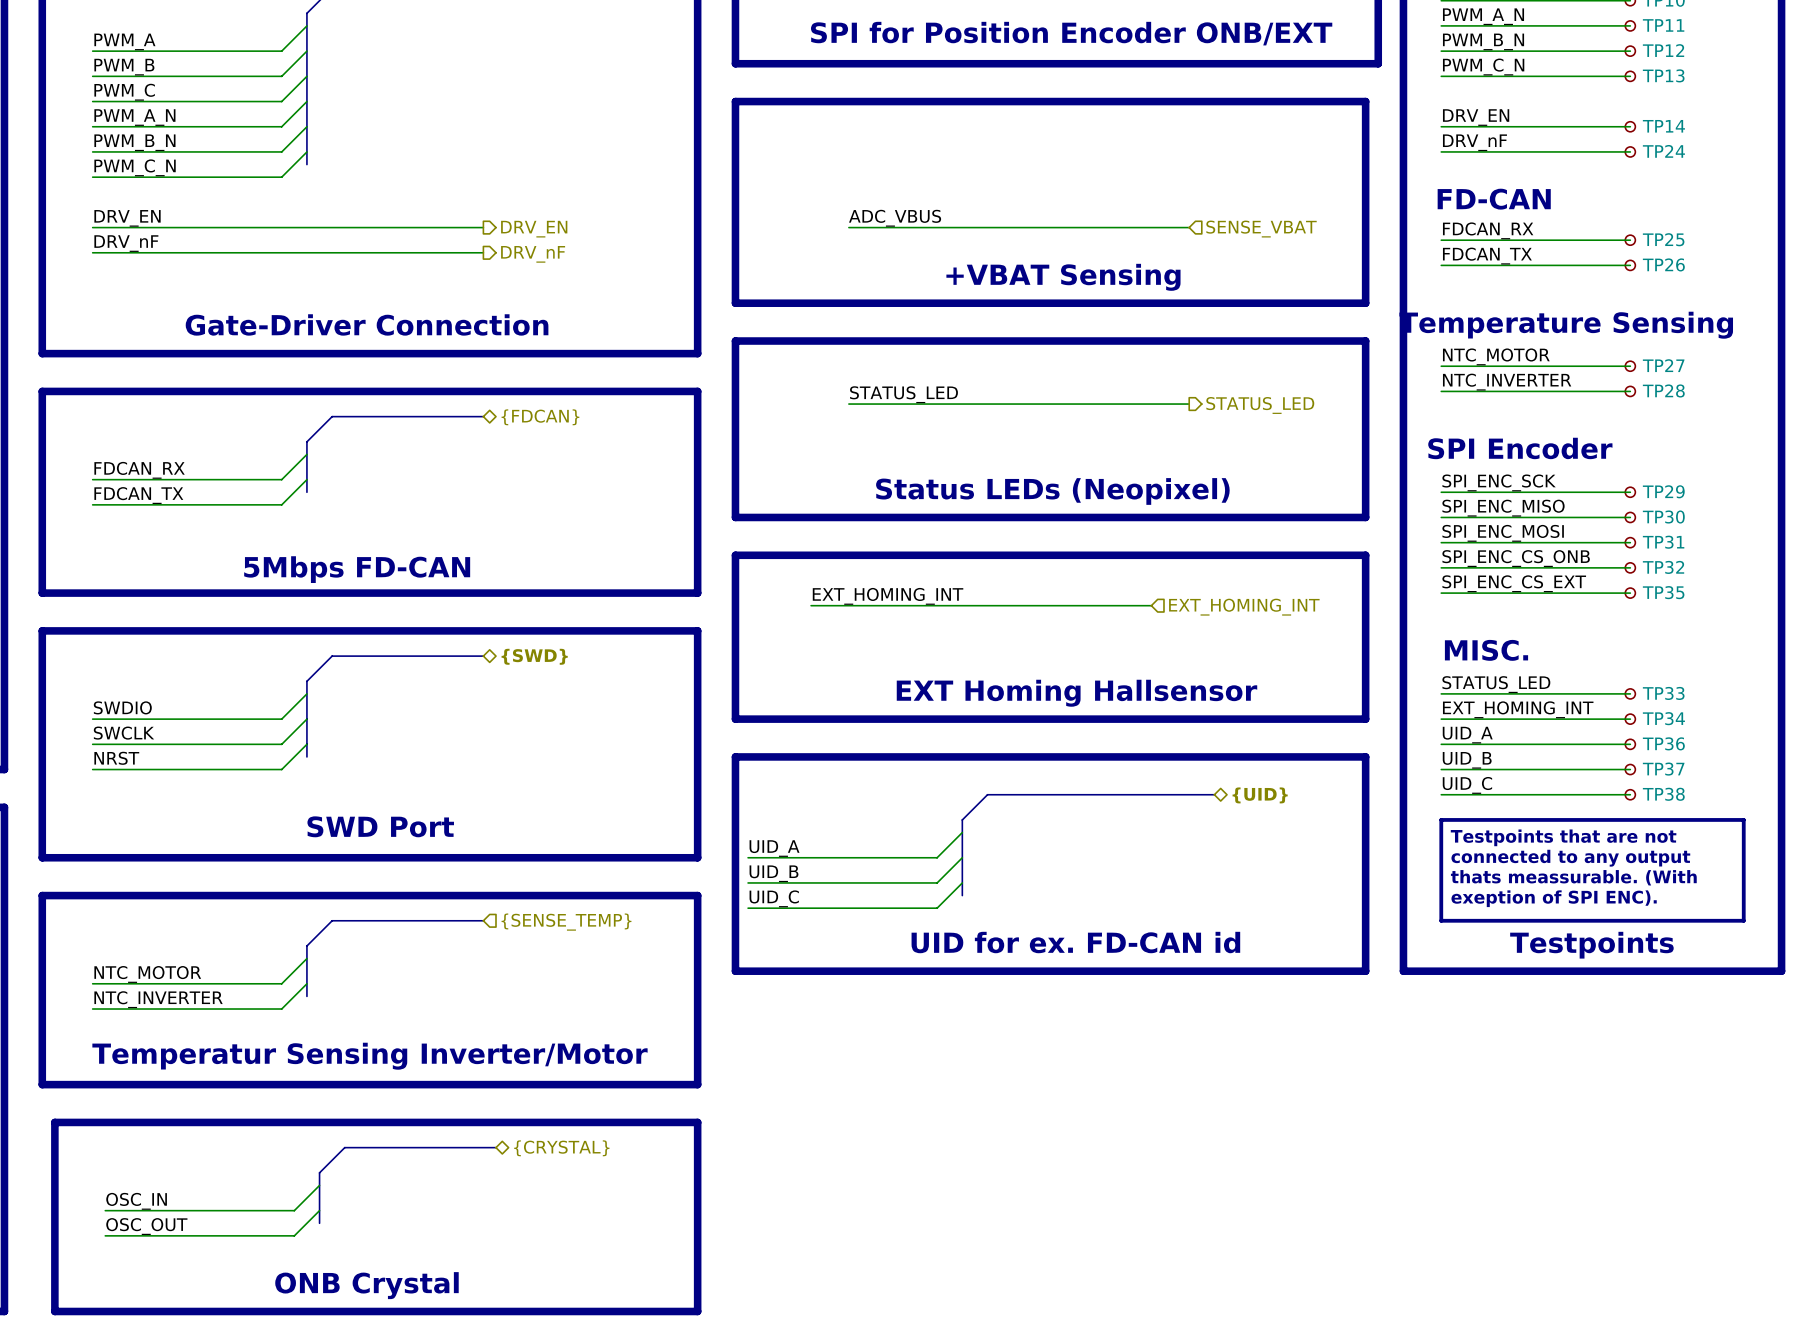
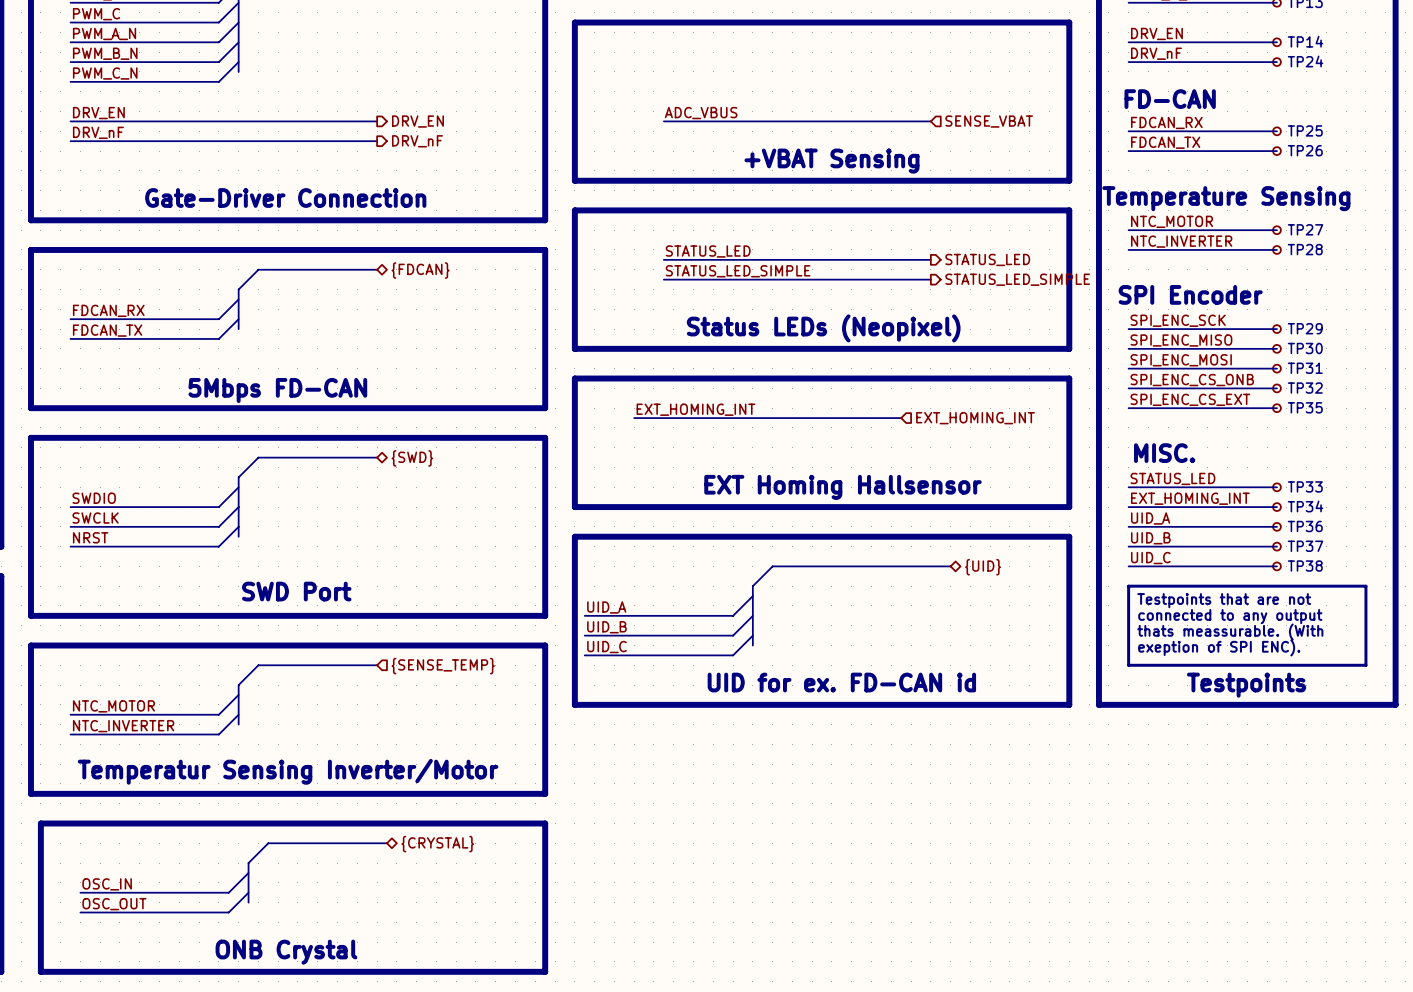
label: none -> STATUS_LED_SIMPLE (738, 271)
wire: none -> (663, 279) (930, 279)
hierarchical label: none -> STATUS_LED_SIMPLE (1017, 279)

